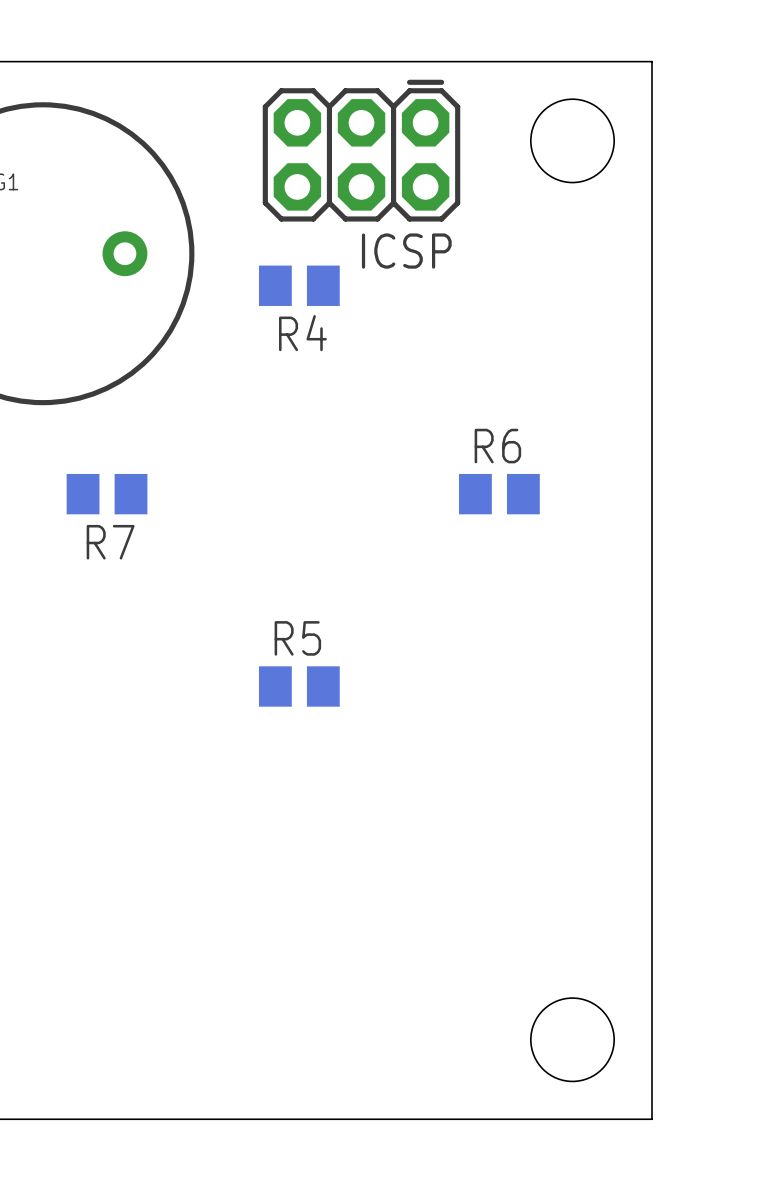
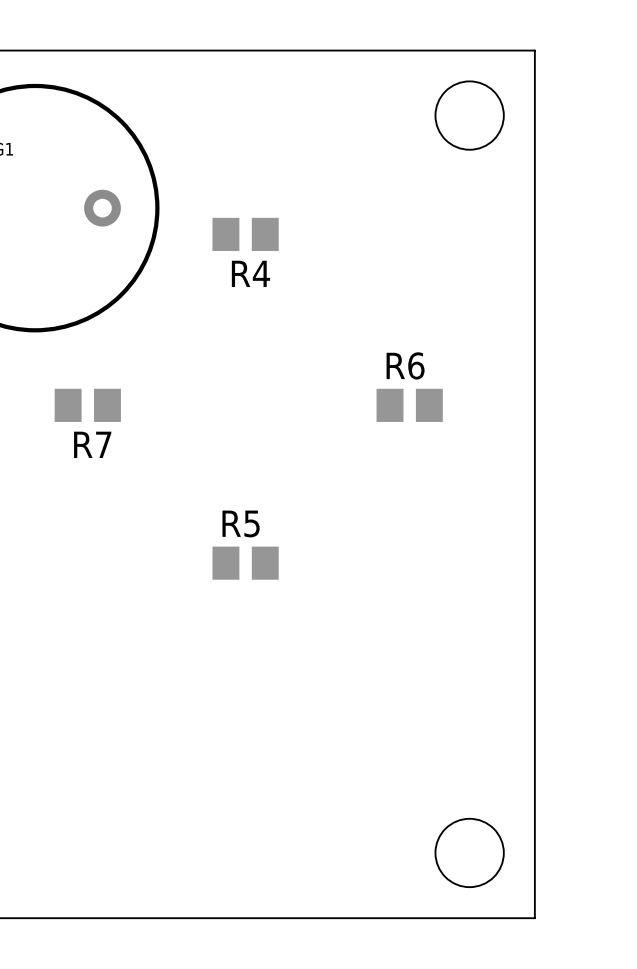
ICSP: (361, 150) -> none

